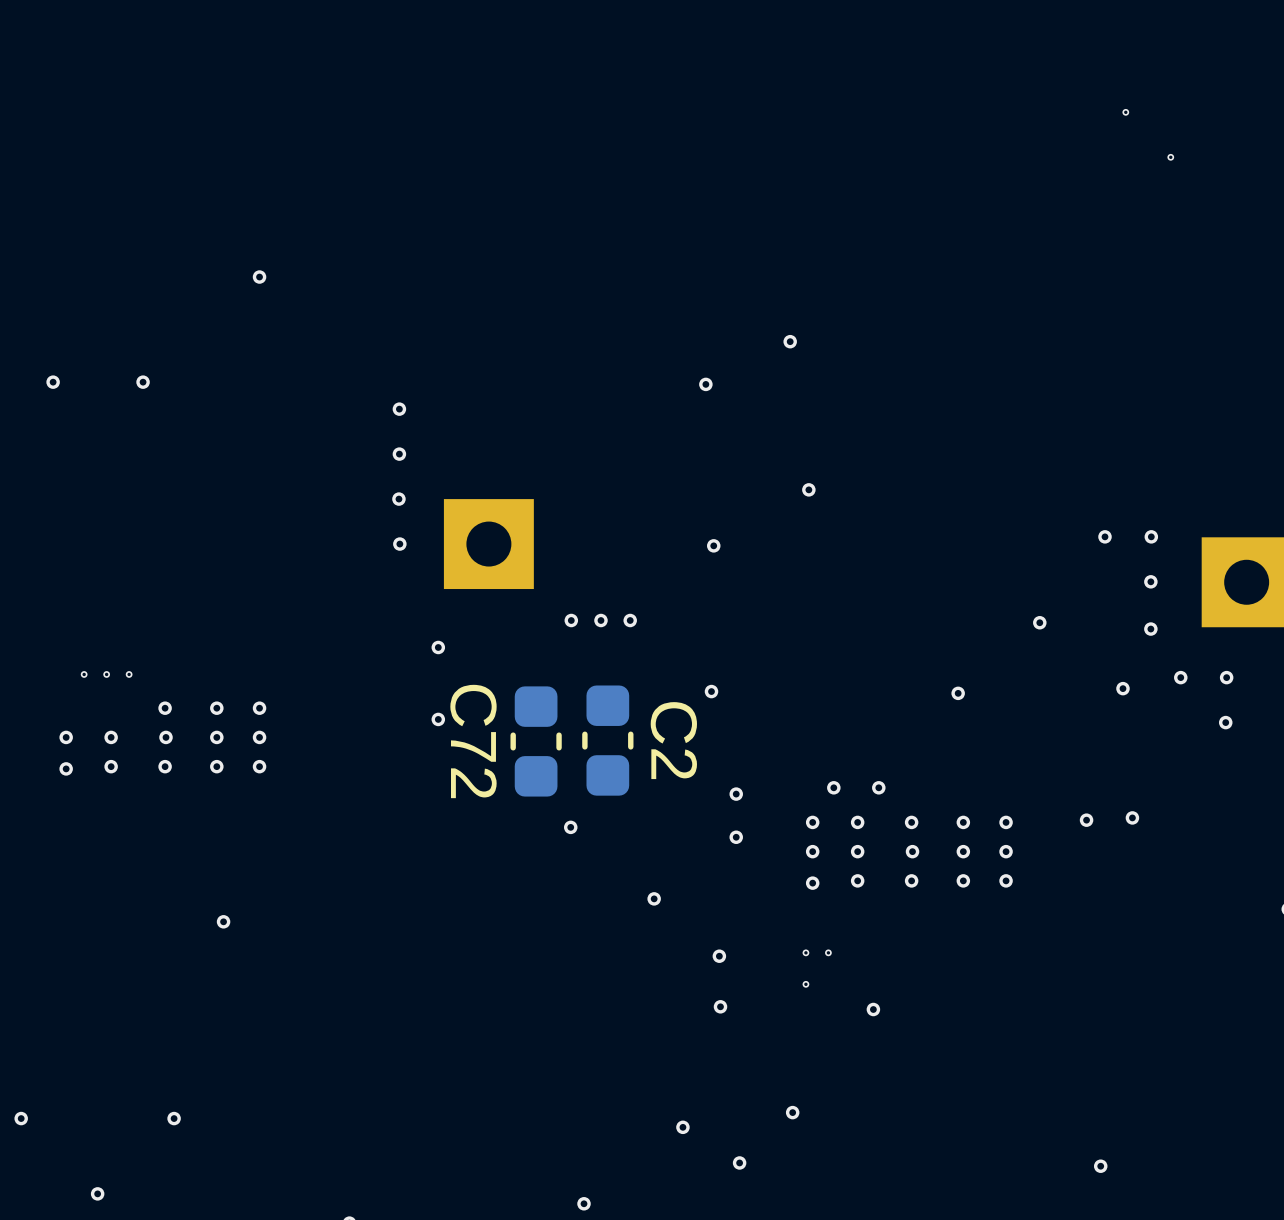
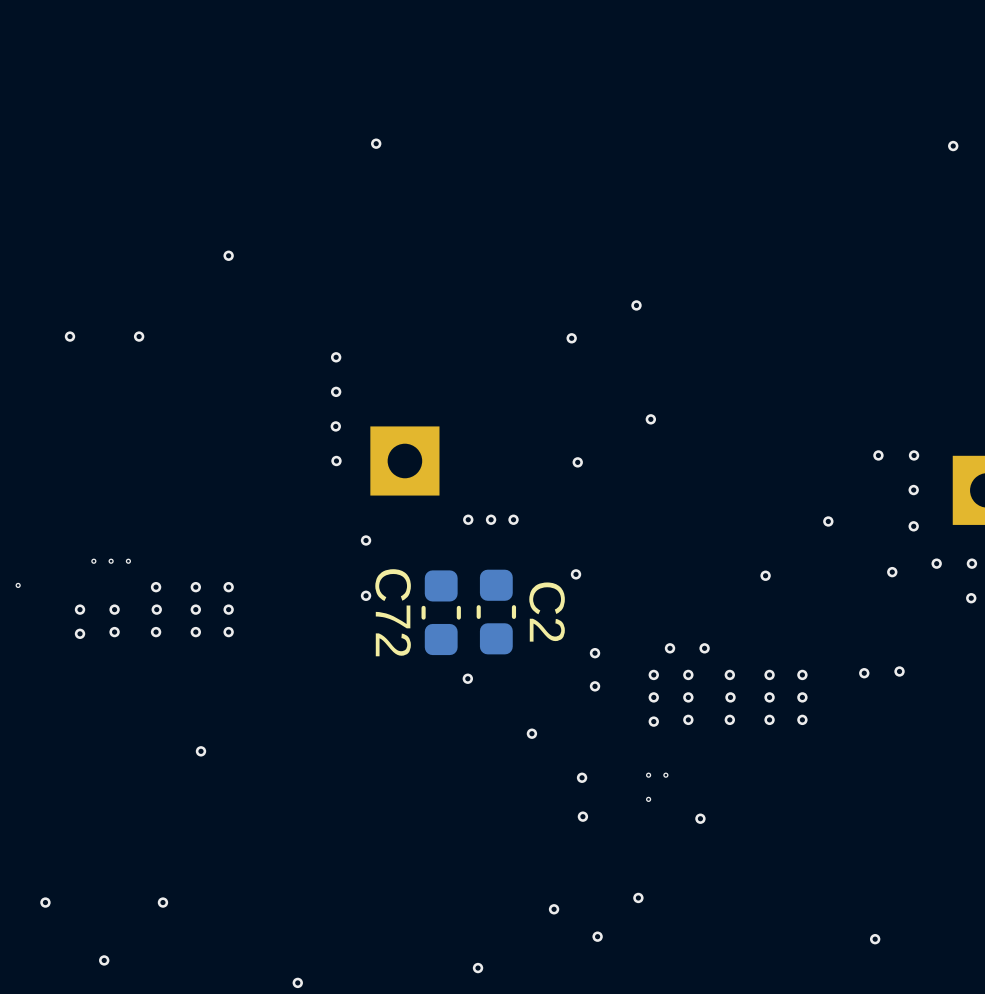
via: (1125, 112) -> none
via: none -> (376, 143)
via: none -> (953, 146)
via: (1170, 157) -> none

